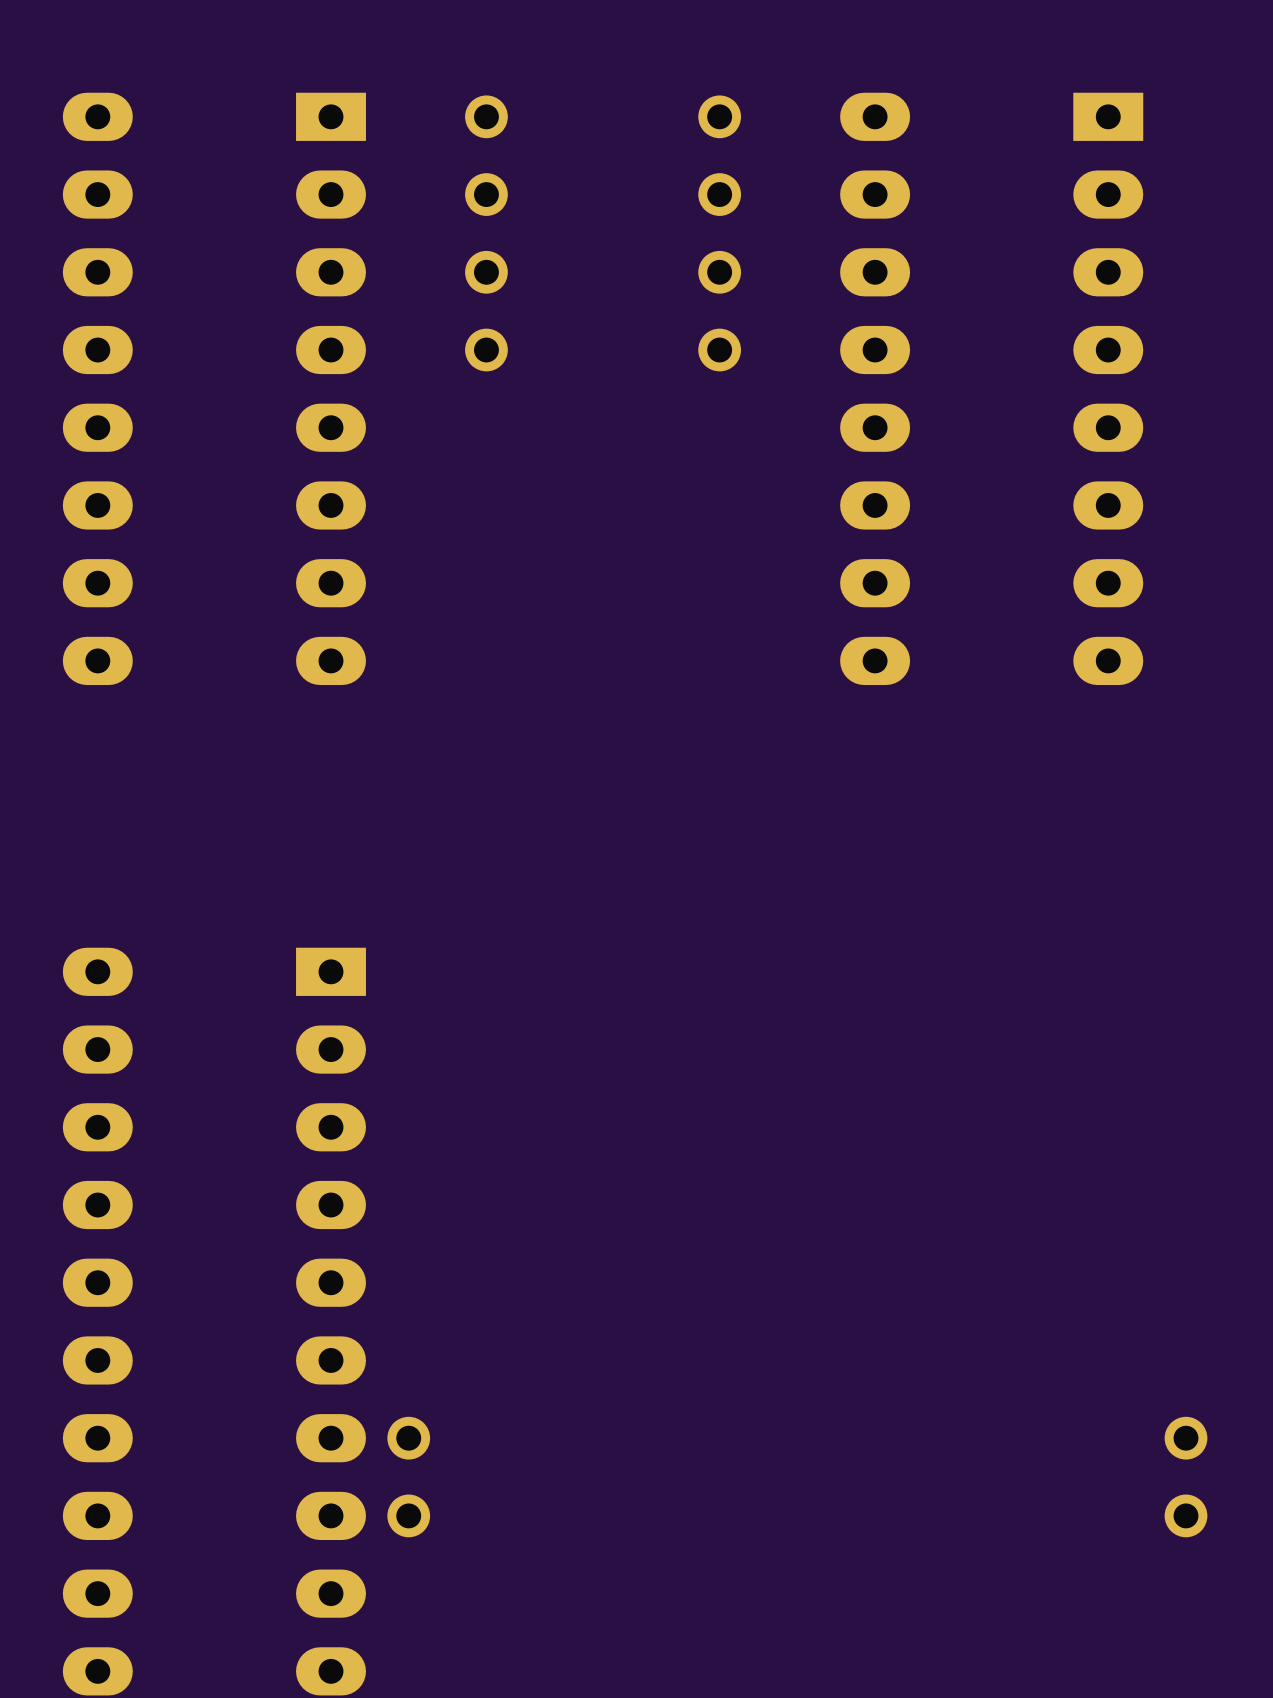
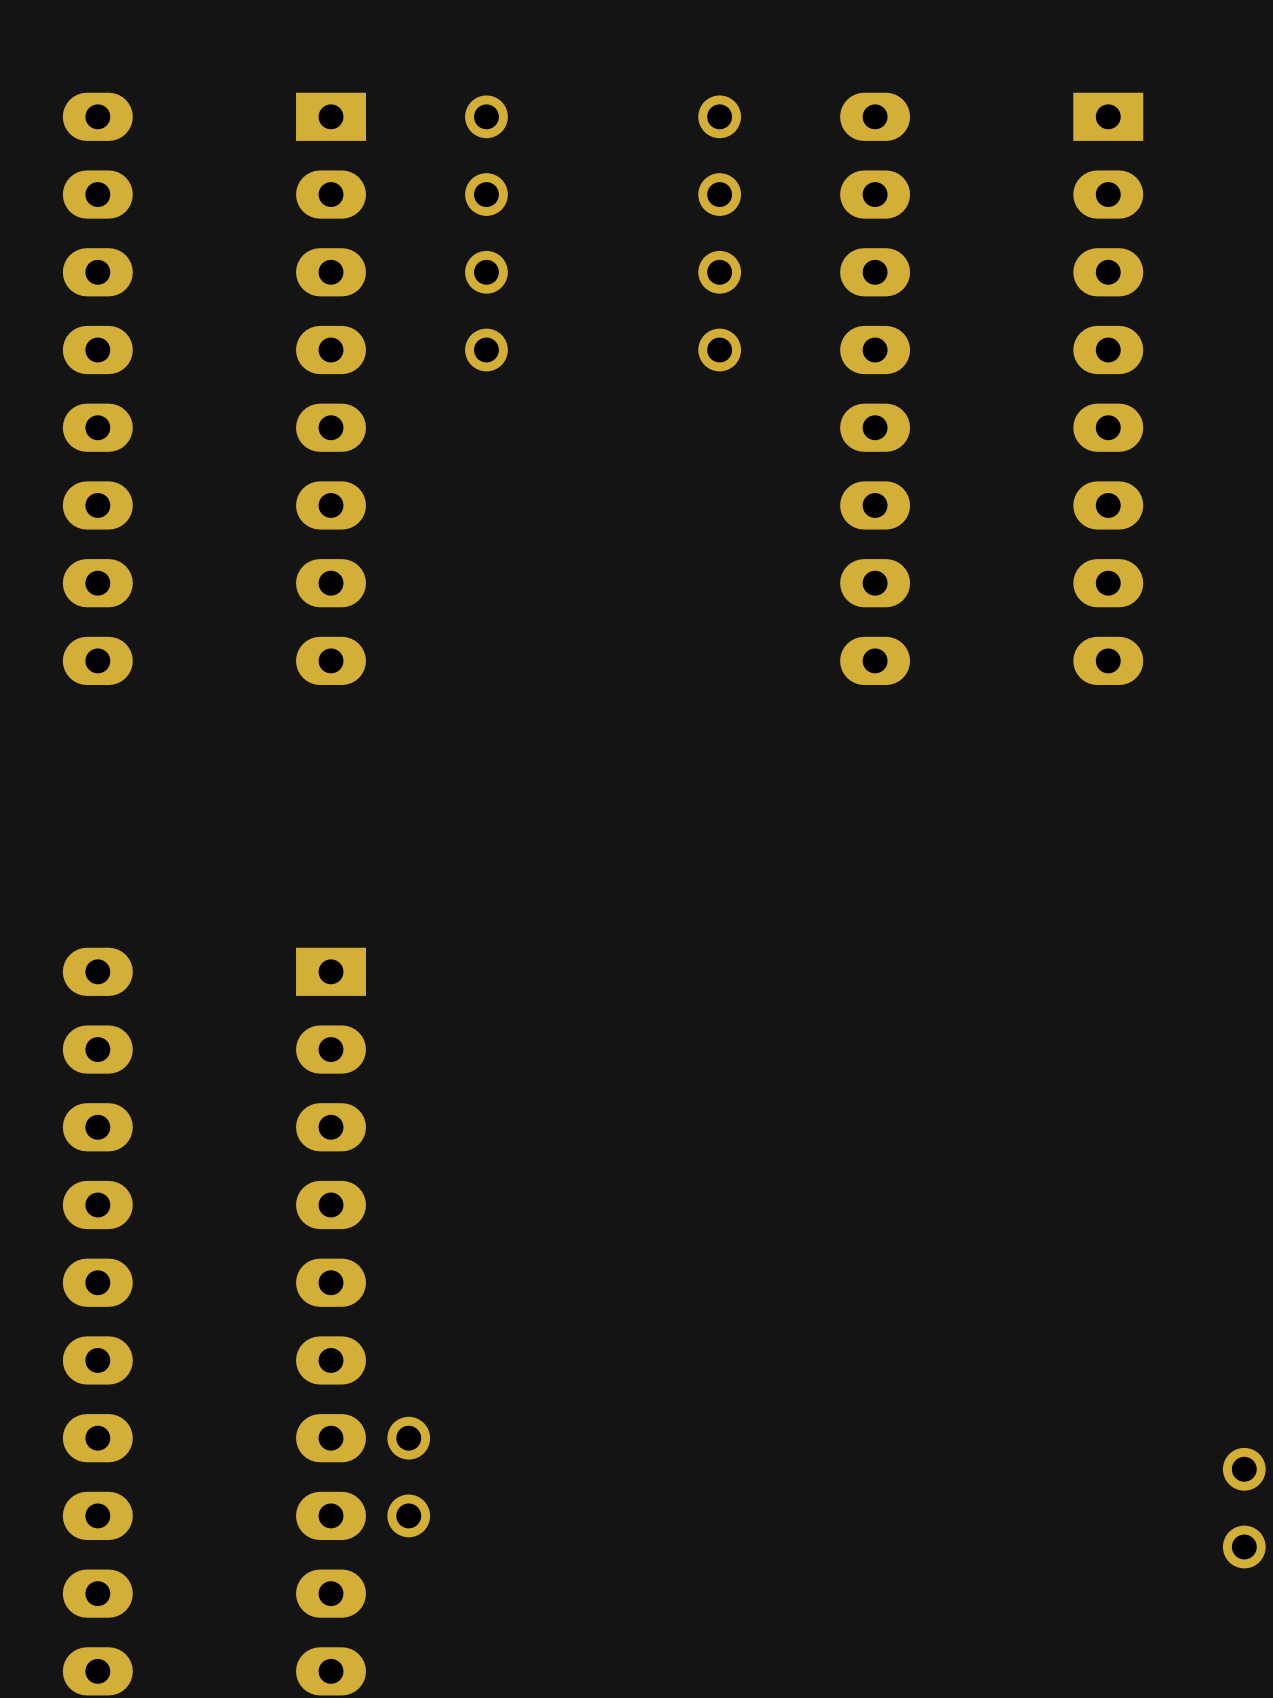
part position: (1186, 1477) -> (1244, 1508)

